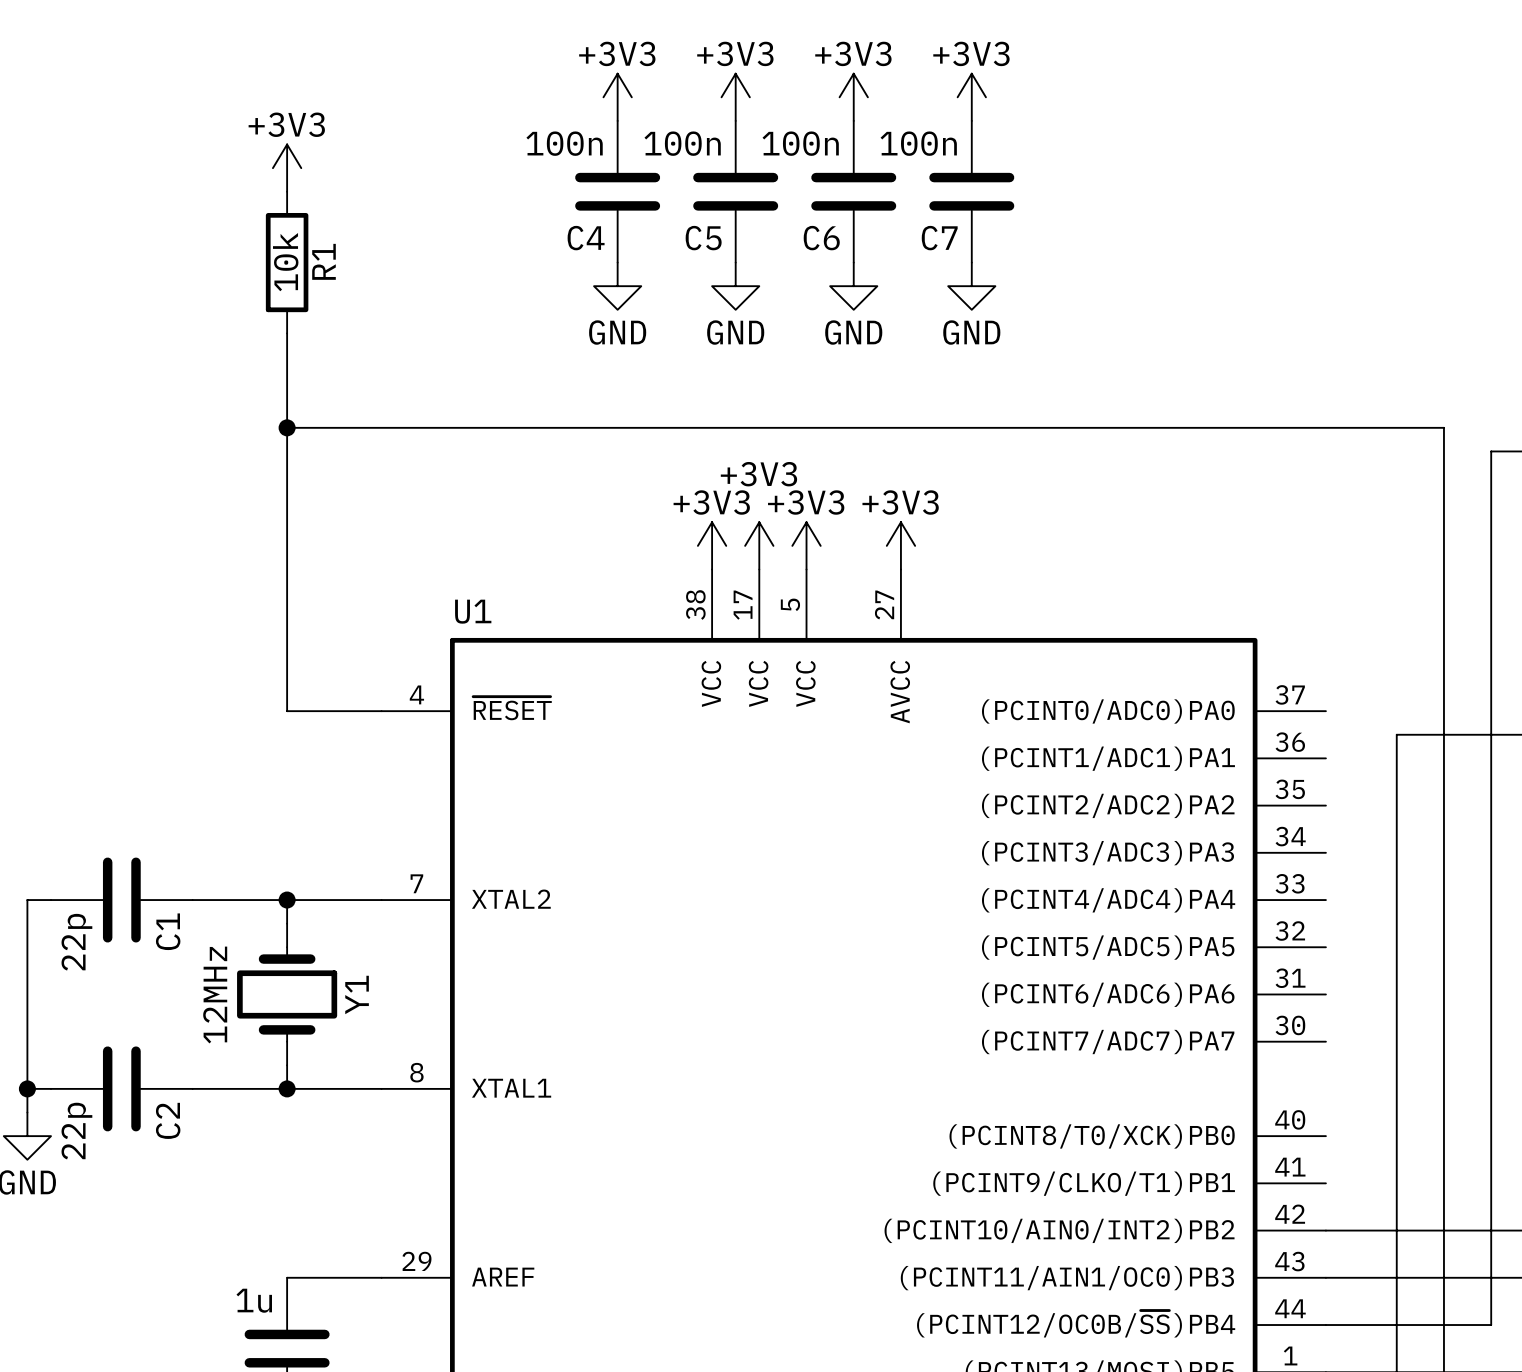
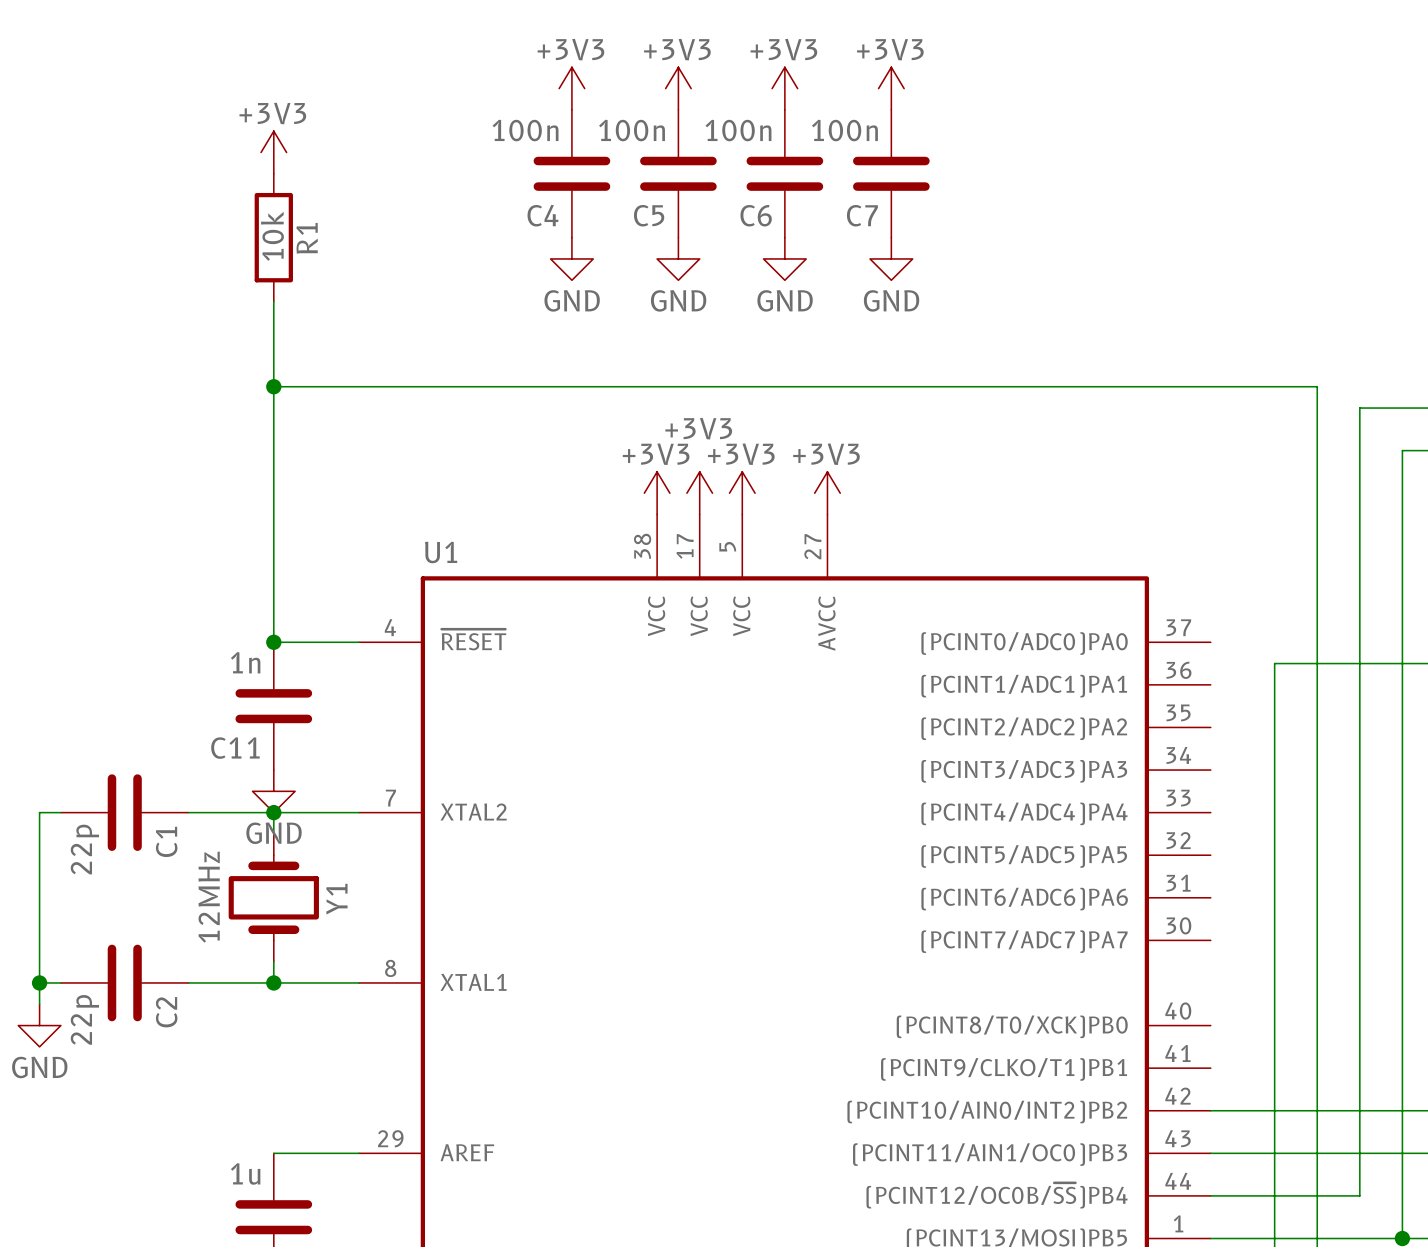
junction: none -> (273, 642)
C11: none -> 1n (273, 706)
power symbol: none -> GND (273, 791)

